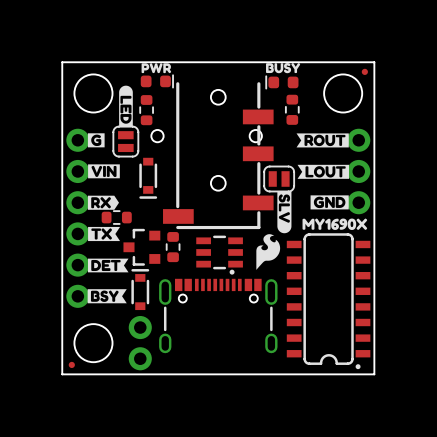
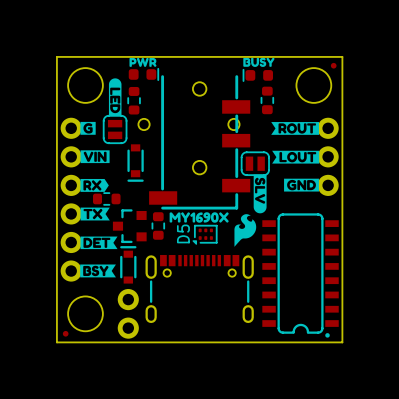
drawing position: (334, 224) -> (199, 217)
part: (219, 255) -> none
D5: none -> (204, 234)

